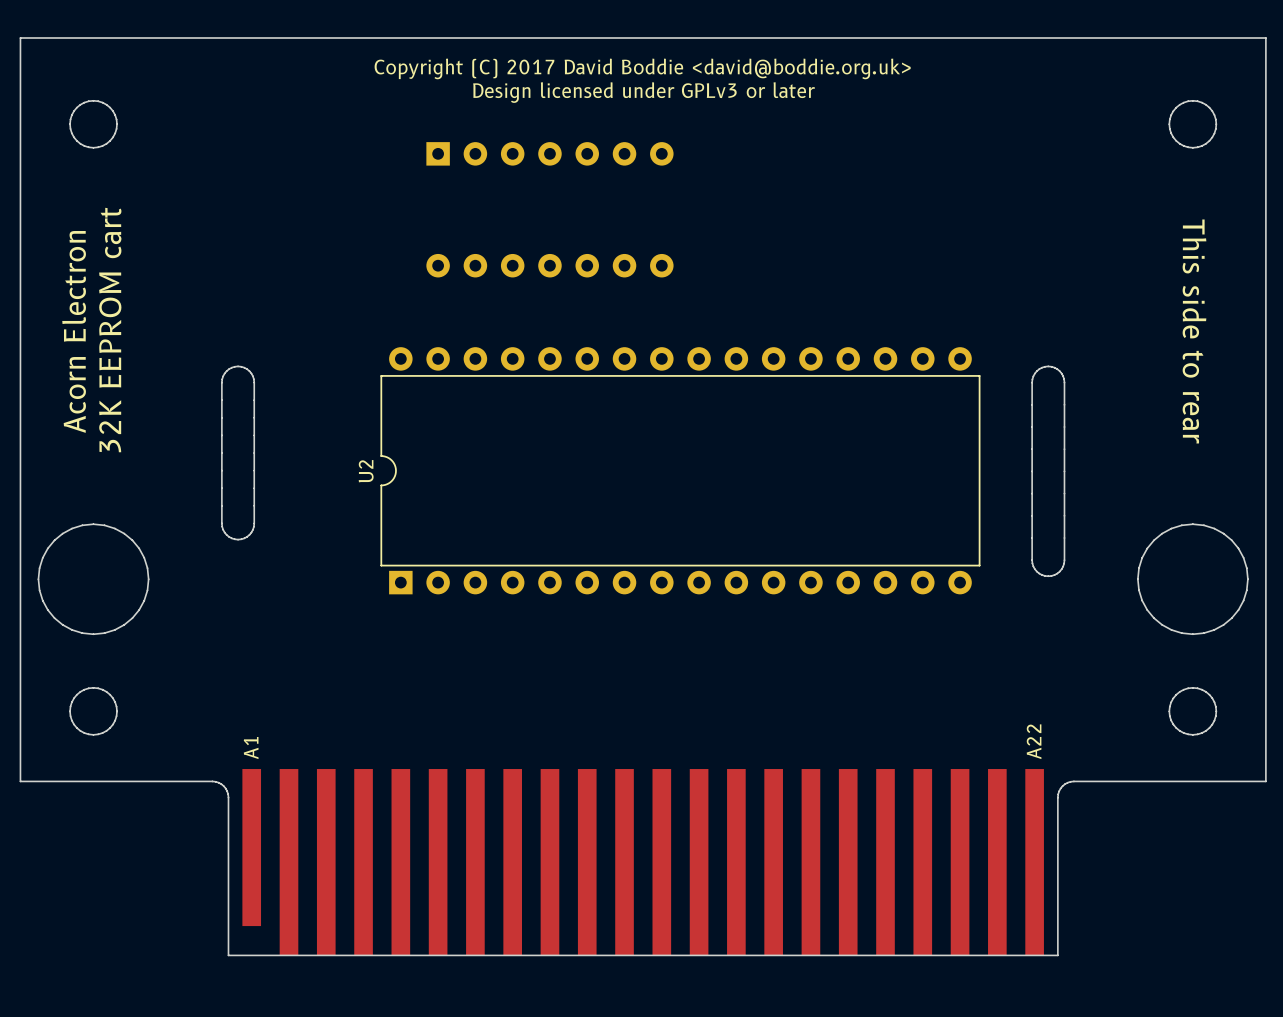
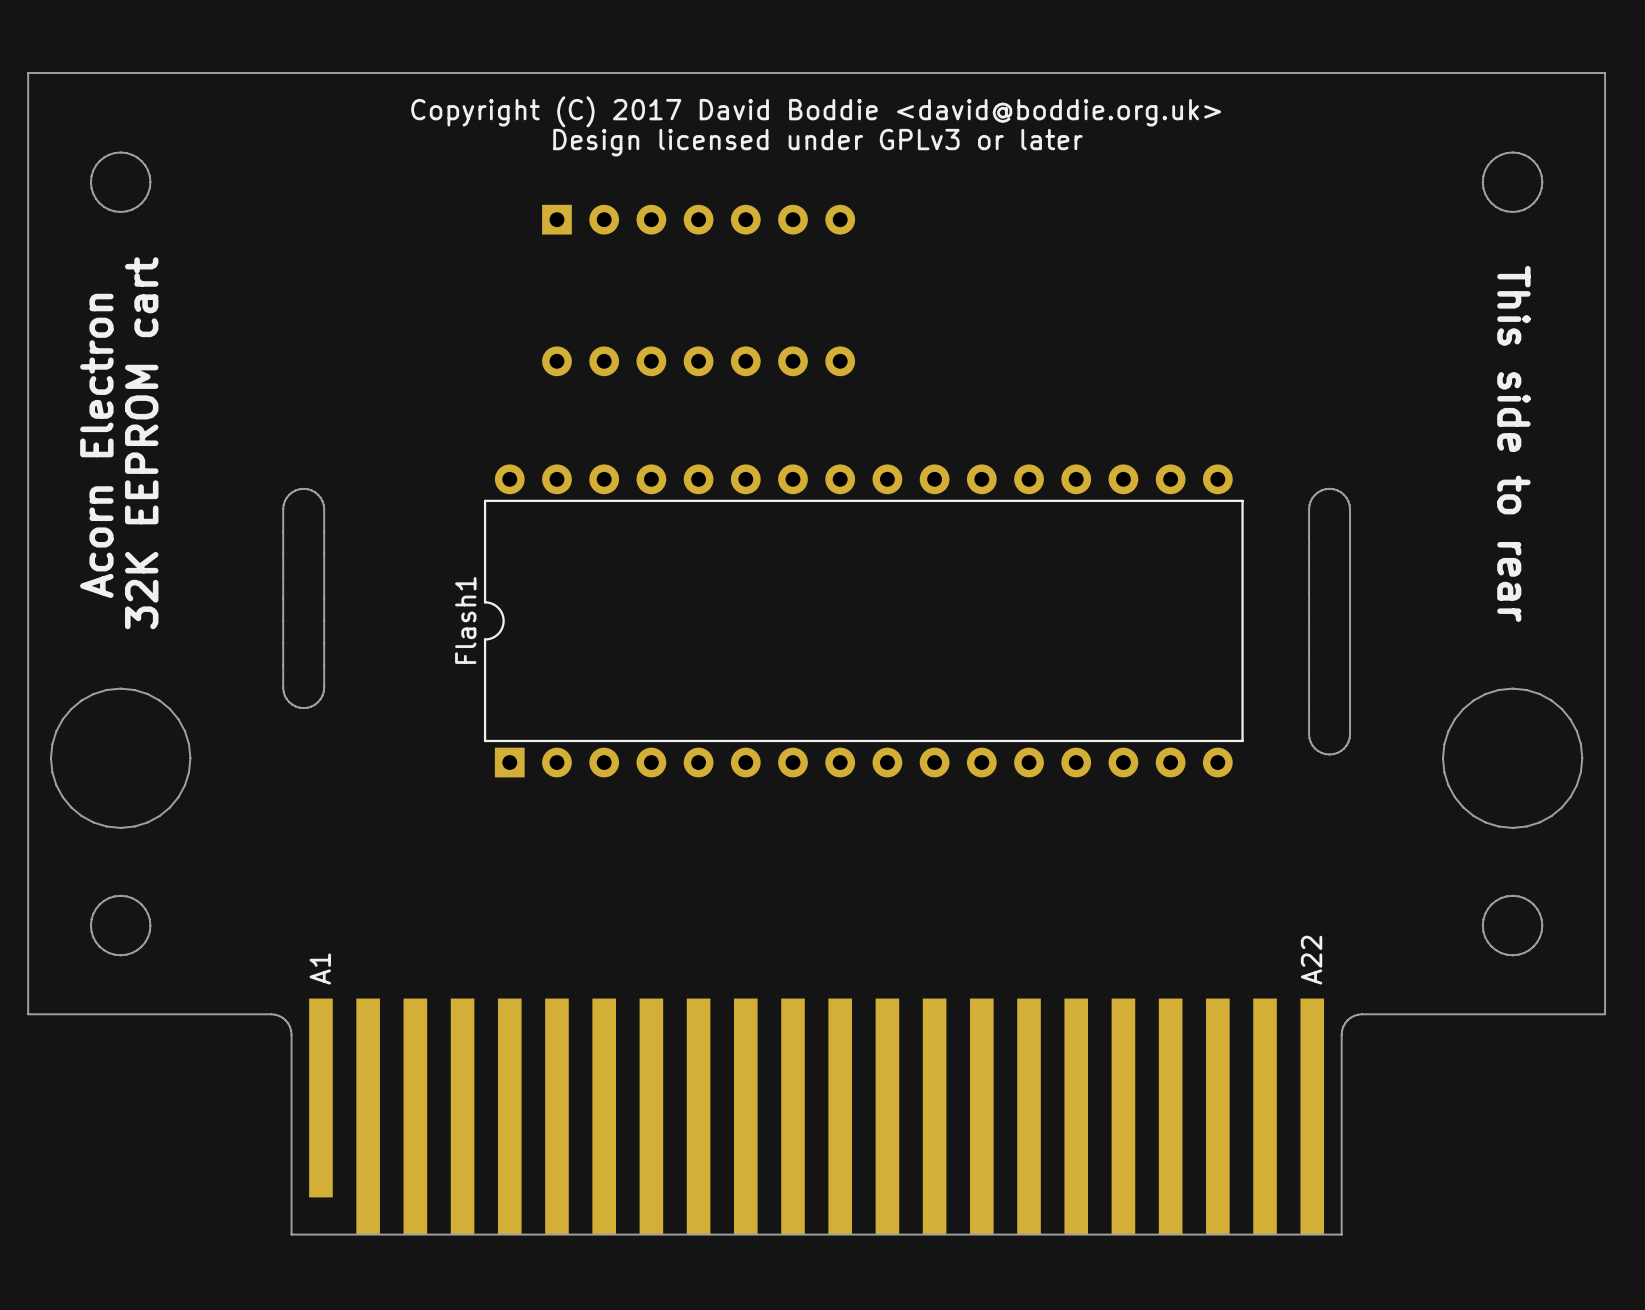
U2 name: U2 (366, 471) -> Flash1 (465, 620)

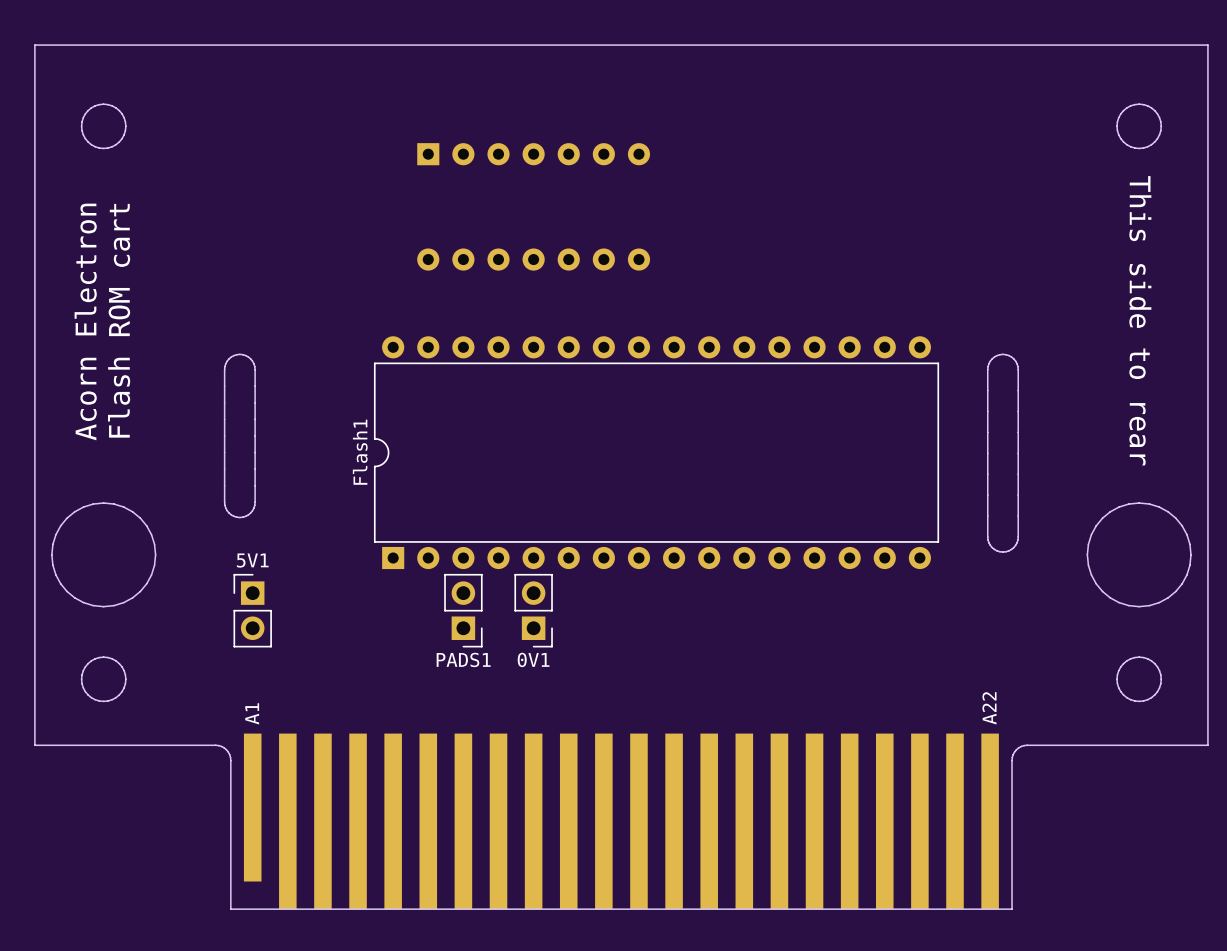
text: Copyright (C) 2017 David Boddie <david@boddie.org.uk> (816, 111) -> none
text: Design licensed under GPLv3 or later (817, 142) -> none
text: 32K EEPROM cart (141, 443) -> Flash ROM cart (119, 320)
5V1: none -> (252, 610)
PADS1: none -> (463, 610)
0V1: none -> (533, 610)

